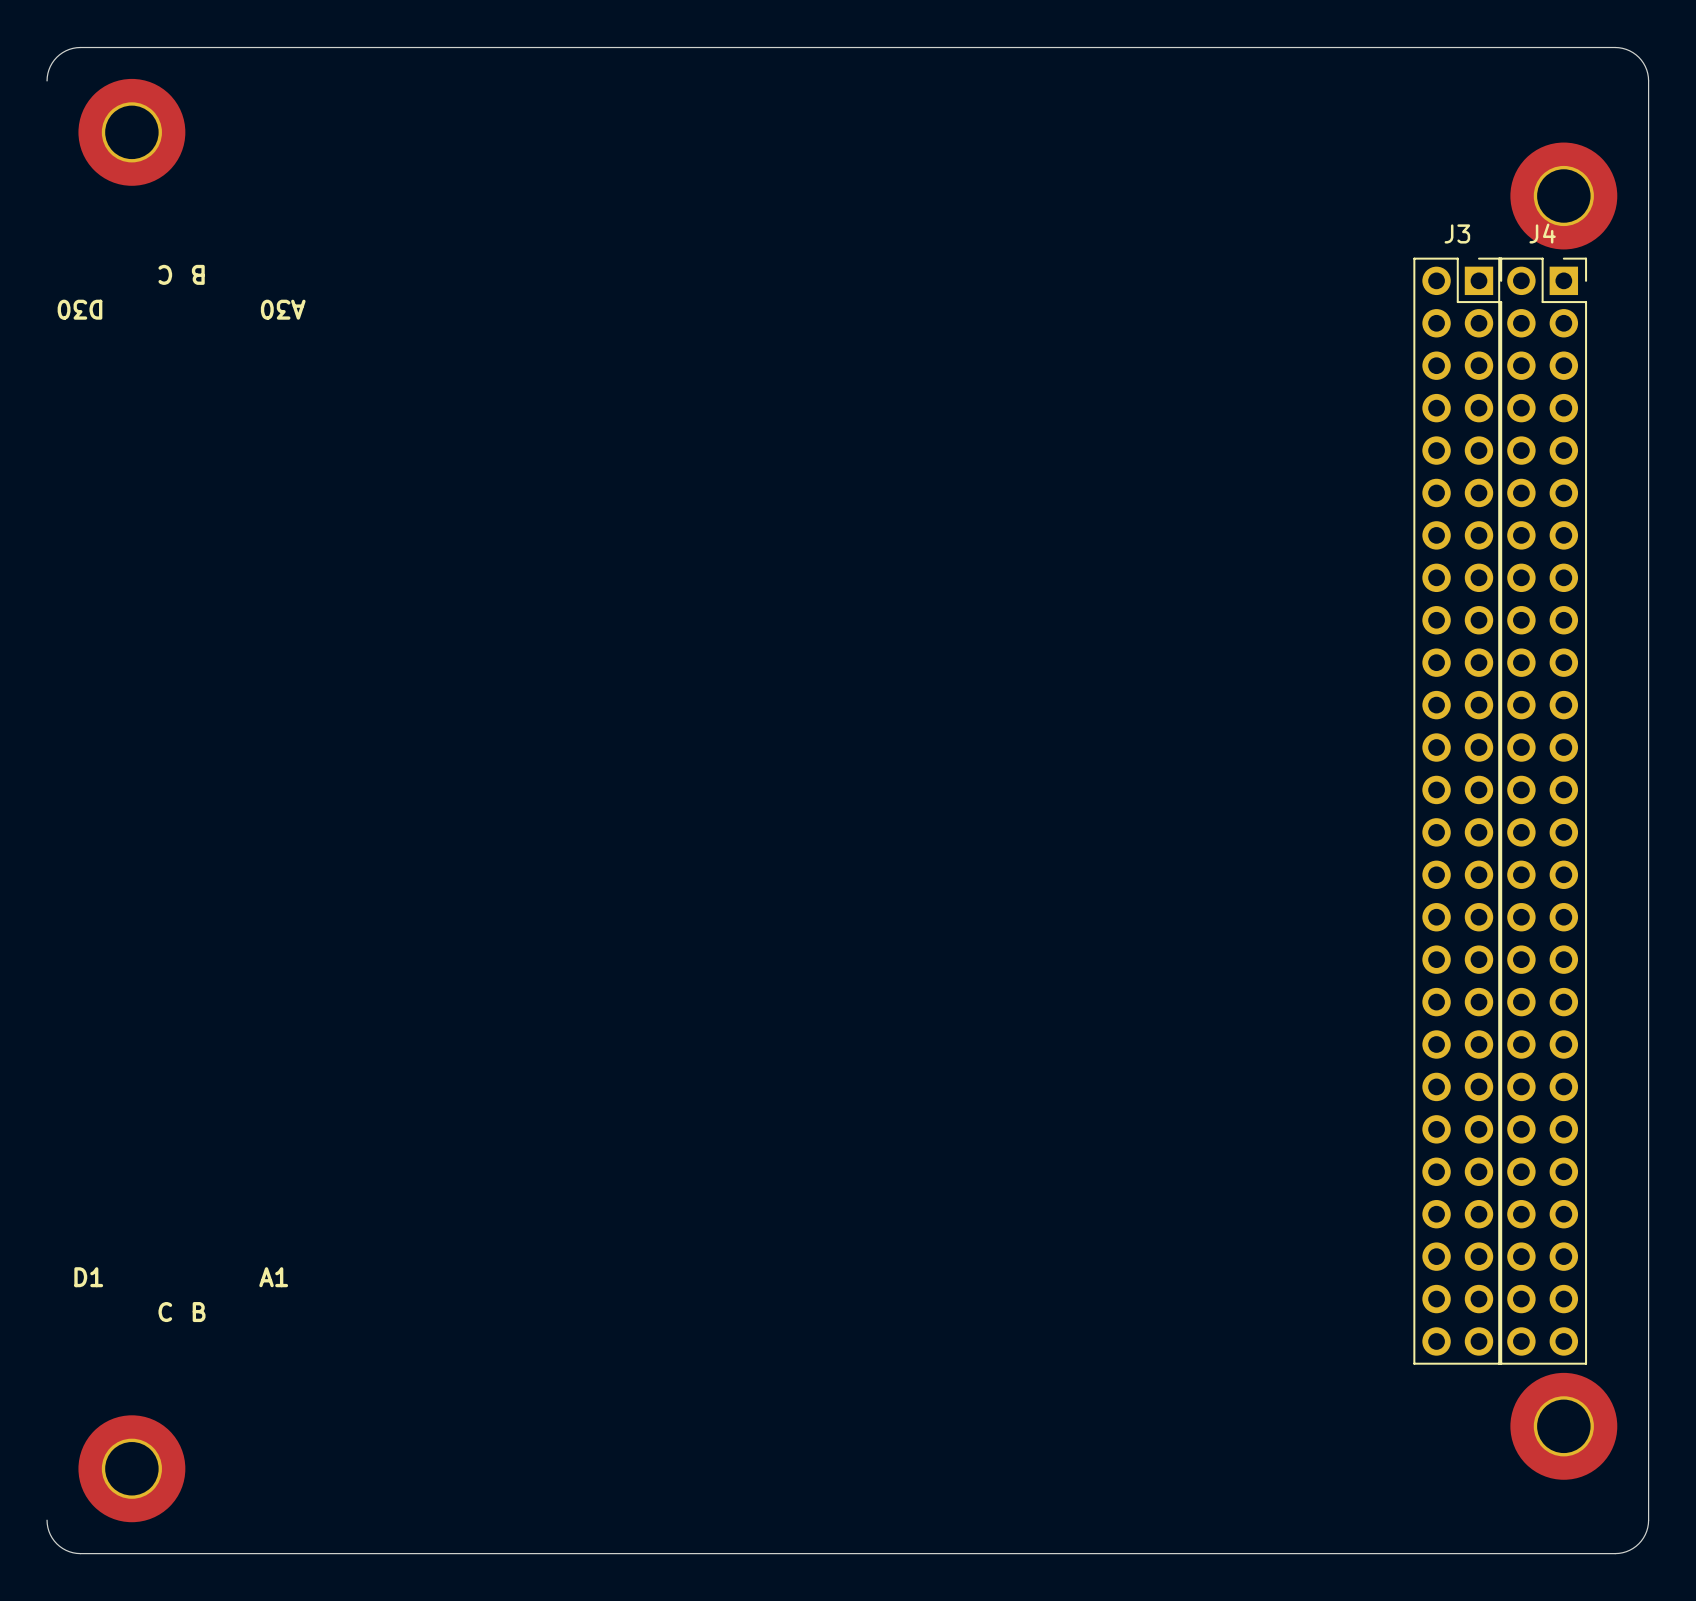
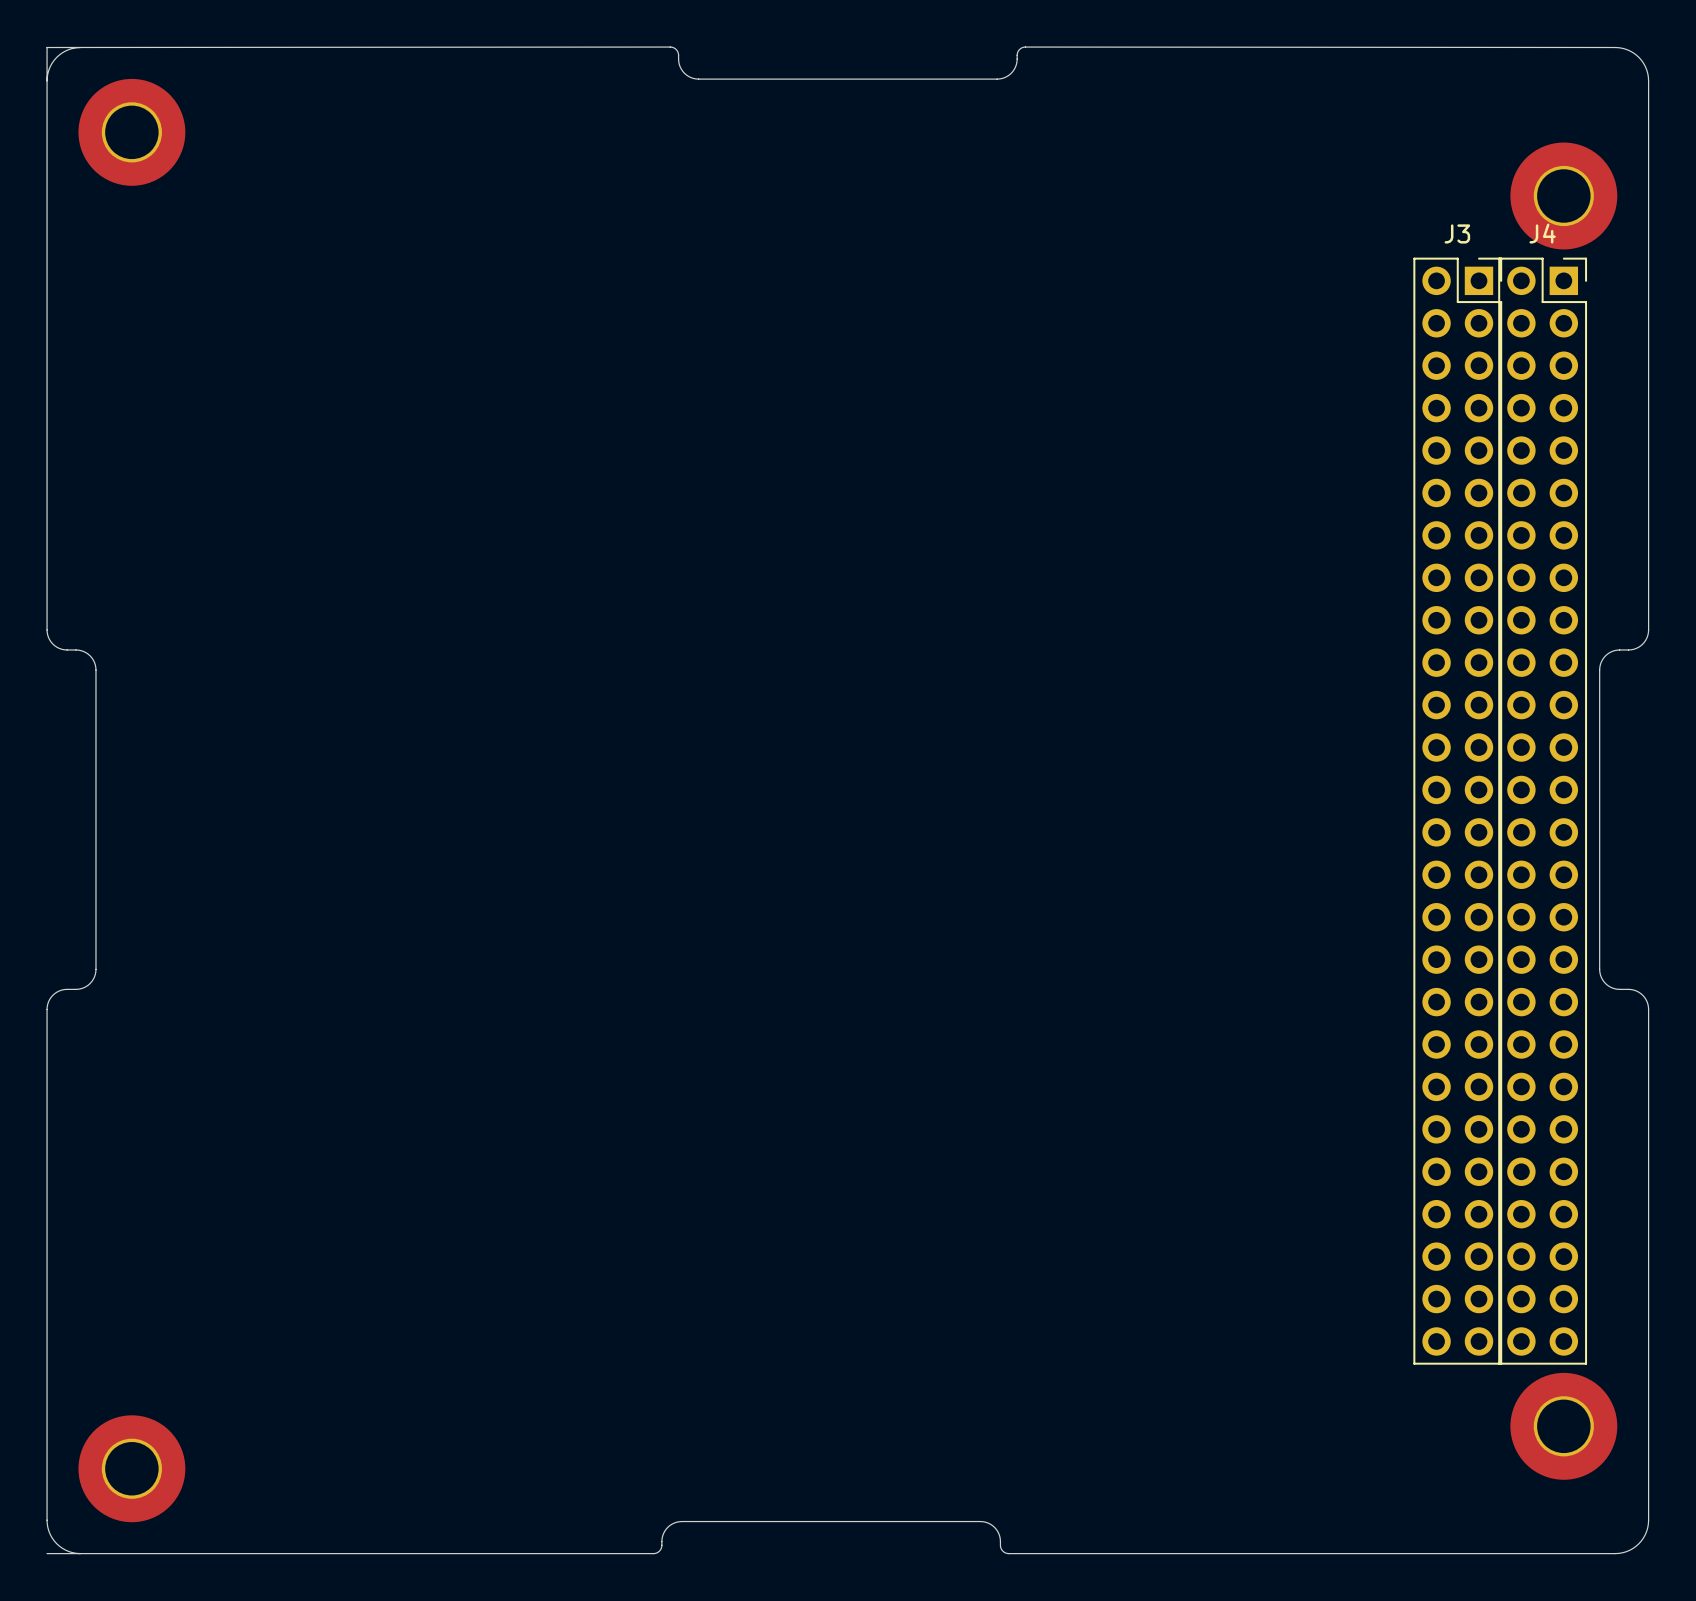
board edge: (80, 47) (1615, 47) -> (47, 1520) (47, 1006) (51, 997) (57, 992) (81, 988) (88, 985) (93, 979) (95, 969) (95, 667) (91, 657) (85, 652) (61, 649) (54, 645) (48, 637) (47, 629) (47, 47) (670, 47) (677, 51) (679, 64) (684, 73) (690, 77) (698, 79) (999, 78) (1012, 71) (1016, 63) (1017, 51) (1025, 47) (1615, 47)
text: C (165, 274) -> none
text: B (198, 274) -> none
text: D30 (79, 309) -> none
text: A30 (283, 309) -> none
board edge: (1648, 629) (1648, 1009) -> (1648, 629) (1647, 637) (1640, 645) (1633, 649) (1609, 652) (1602, 660) (1599, 670) (1599, 971) (1602, 979) (1609, 986) (1633, 990) (1640, 993) (1647, 1001) (1648, 1009)
text: D1 (88, 1277) -> none
text: A1 (273, 1277) -> none
text: C (165, 1312) -> none
text: B (199, 1312) -> none
board edge: none -> (47, 1553) (80, 1553)
board edge: (653, 1553) (1008, 1553) -> (653, 1553) (660, 1549) (662, 1536) (667, 1527) (674, 1523) (681, 1521) (983, 1521) (990, 1524) (996, 1529) (999, 1536) (1001, 1549) (1008, 1553)

